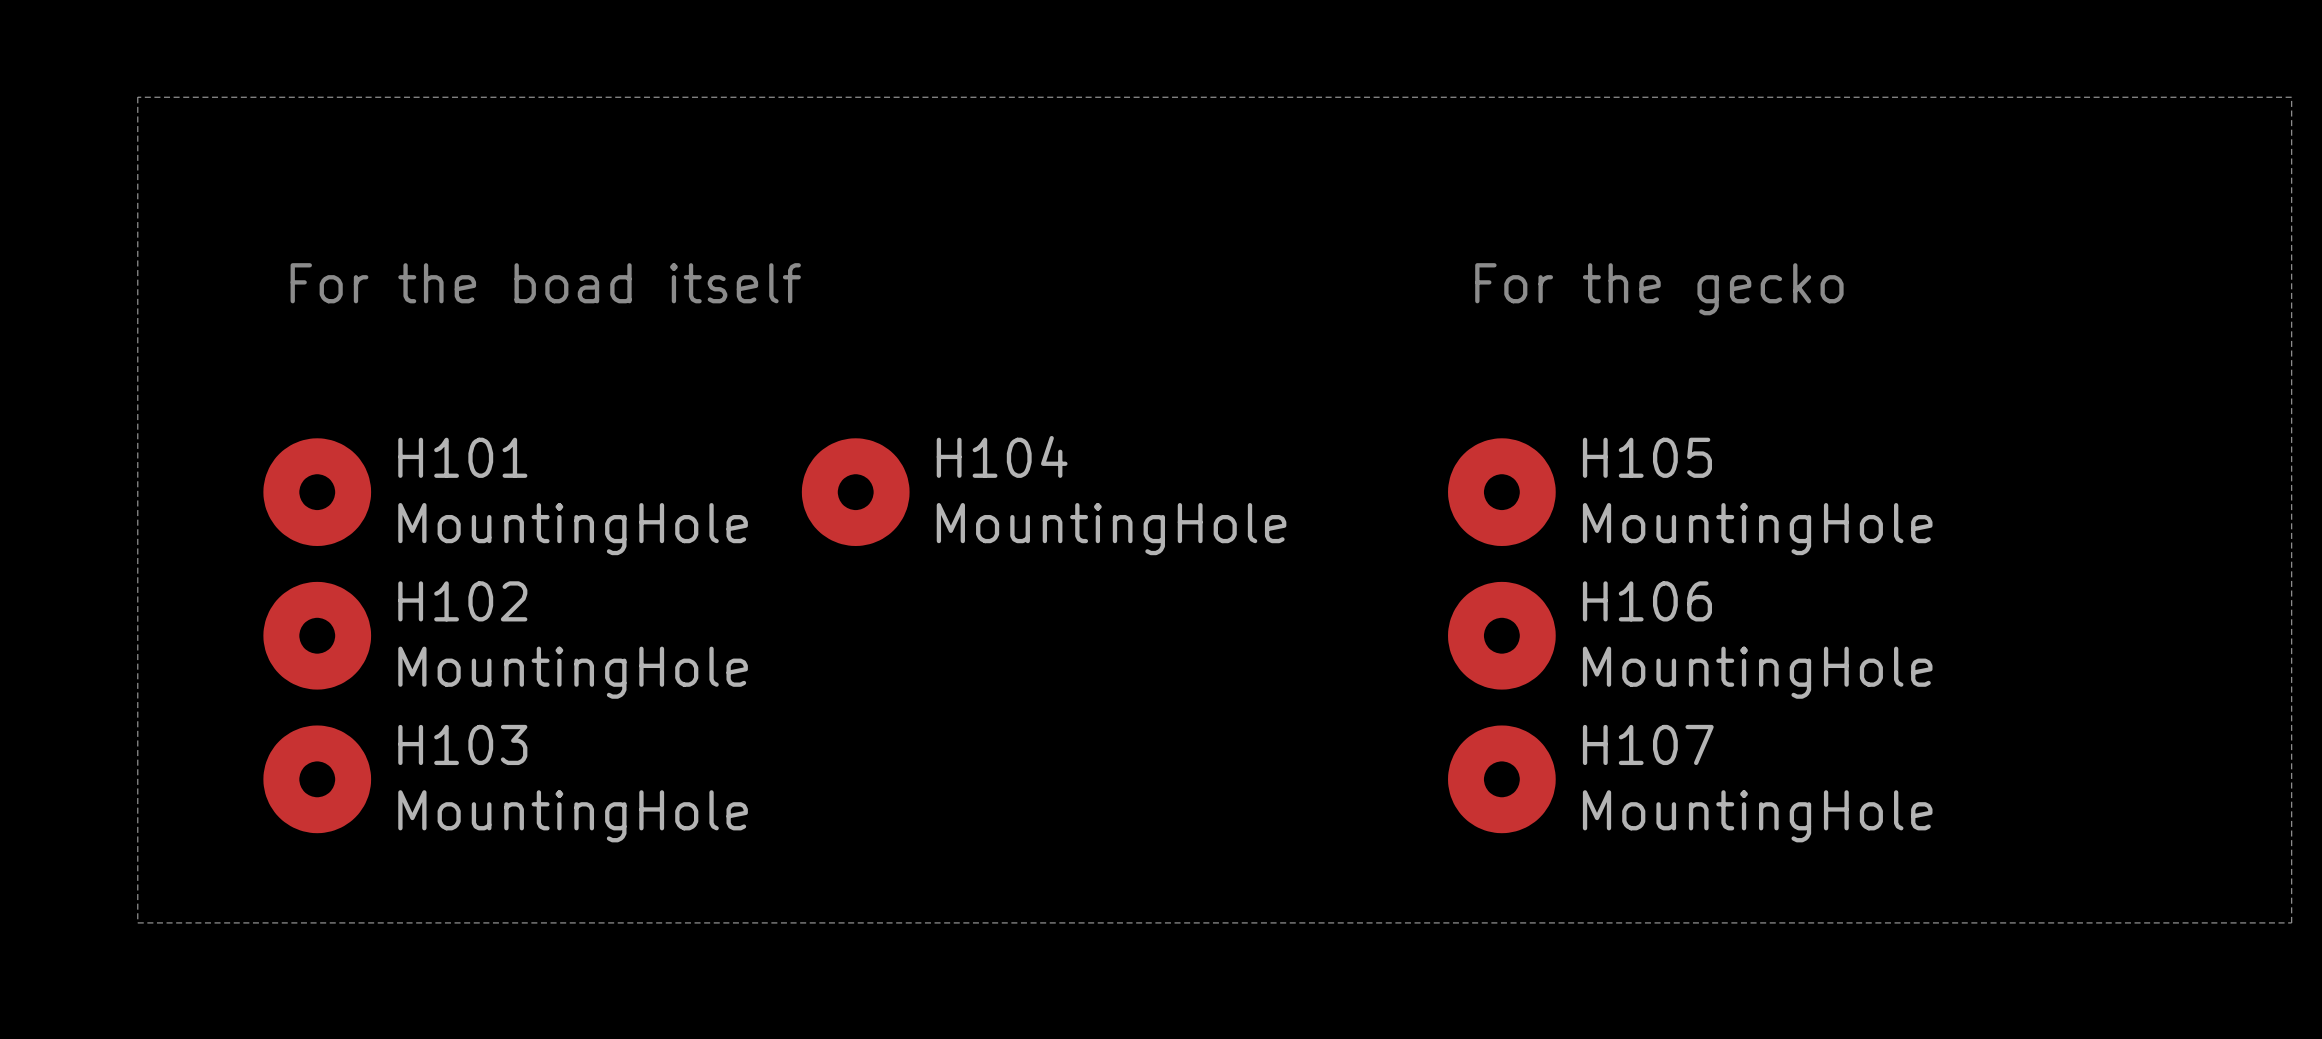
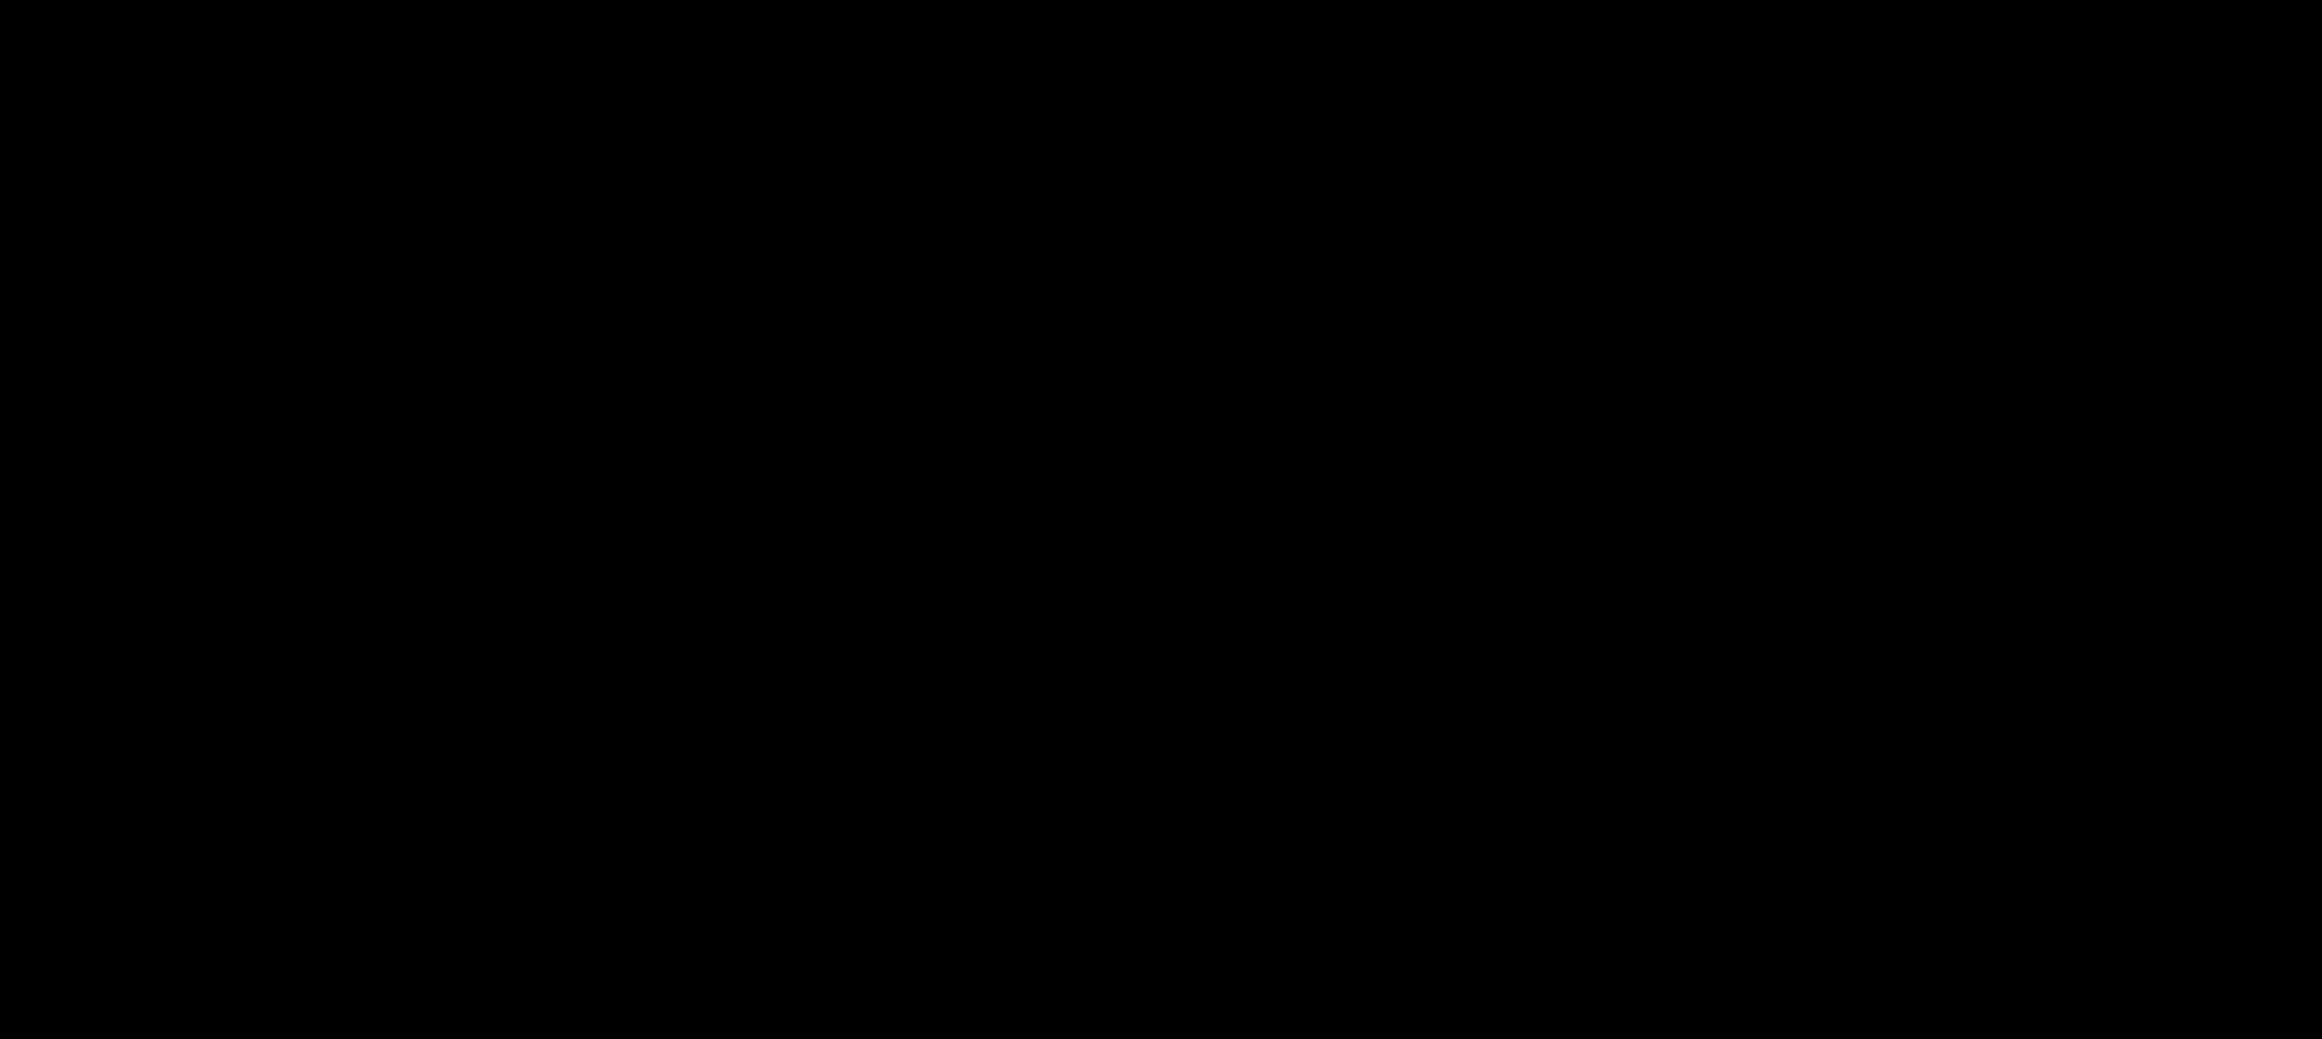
line: (137, 97) (2291, 97) (2291, 922) (137, 922) (137, 97) -> none
text: For the boad itself (545, 283) -> none
text: For the gecko (1659, 289) -> none
H101: MountingHole (317, 492) -> none
H104: MountingHole (855, 492) -> none
H105: MountingHole (1501, 492) -> none
H102: MountingHole (317, 635) -> none
H106: MountingHole (1501, 635) -> none
H103: MountingHole (317, 779) -> none
H107: MountingHole (1501, 779) -> none

